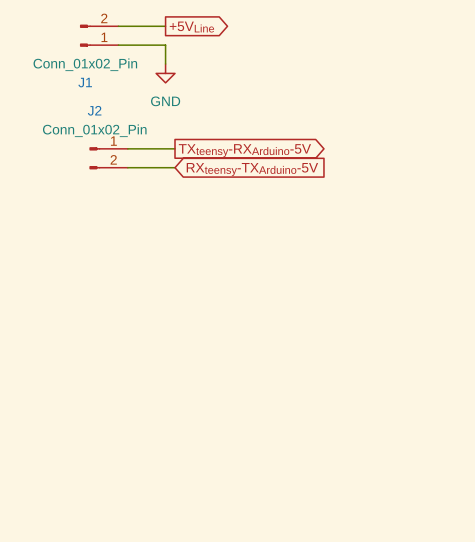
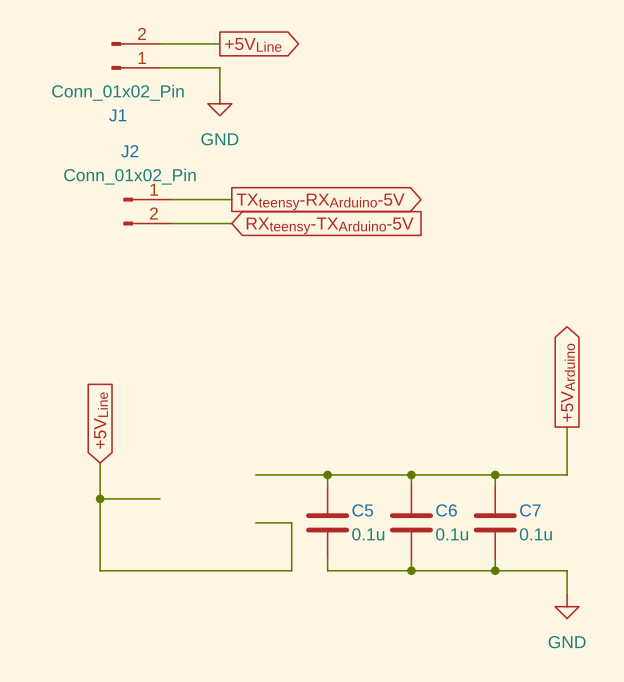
global label: none -> +5VArduino (568, 382)
global label: none -> +5VLine (101, 420)
wire: none -> (567, 427) (567, 474) (255, 474)
wire: none -> (100, 462) (100, 570) (291, 570) (291, 522) (255, 522)
wire: none -> (327, 474) (327, 486)
junction: none -> (327, 474)
wire: none -> (411, 474) (411, 486)
junction: none -> (411, 474)
wire: none -> (495, 474) (495, 486)
junction: none -> (495, 474)
wire: none -> (100, 498) (159, 498)
junction: none -> (100, 498)
C5: none -> 0.1u (327, 522)
C6: none -> 0.1u (411, 522)
C7: none -> 0.1u (495, 522)
wire: none -> (327, 558) (327, 570) (567, 570) (567, 594)
wire: none -> (411, 558) (411, 570)
wire: none -> (495, 558) (495, 570)
junction: none -> (411, 570)
junction: none -> (495, 570)
power symbol: none -> GND (567, 606)

